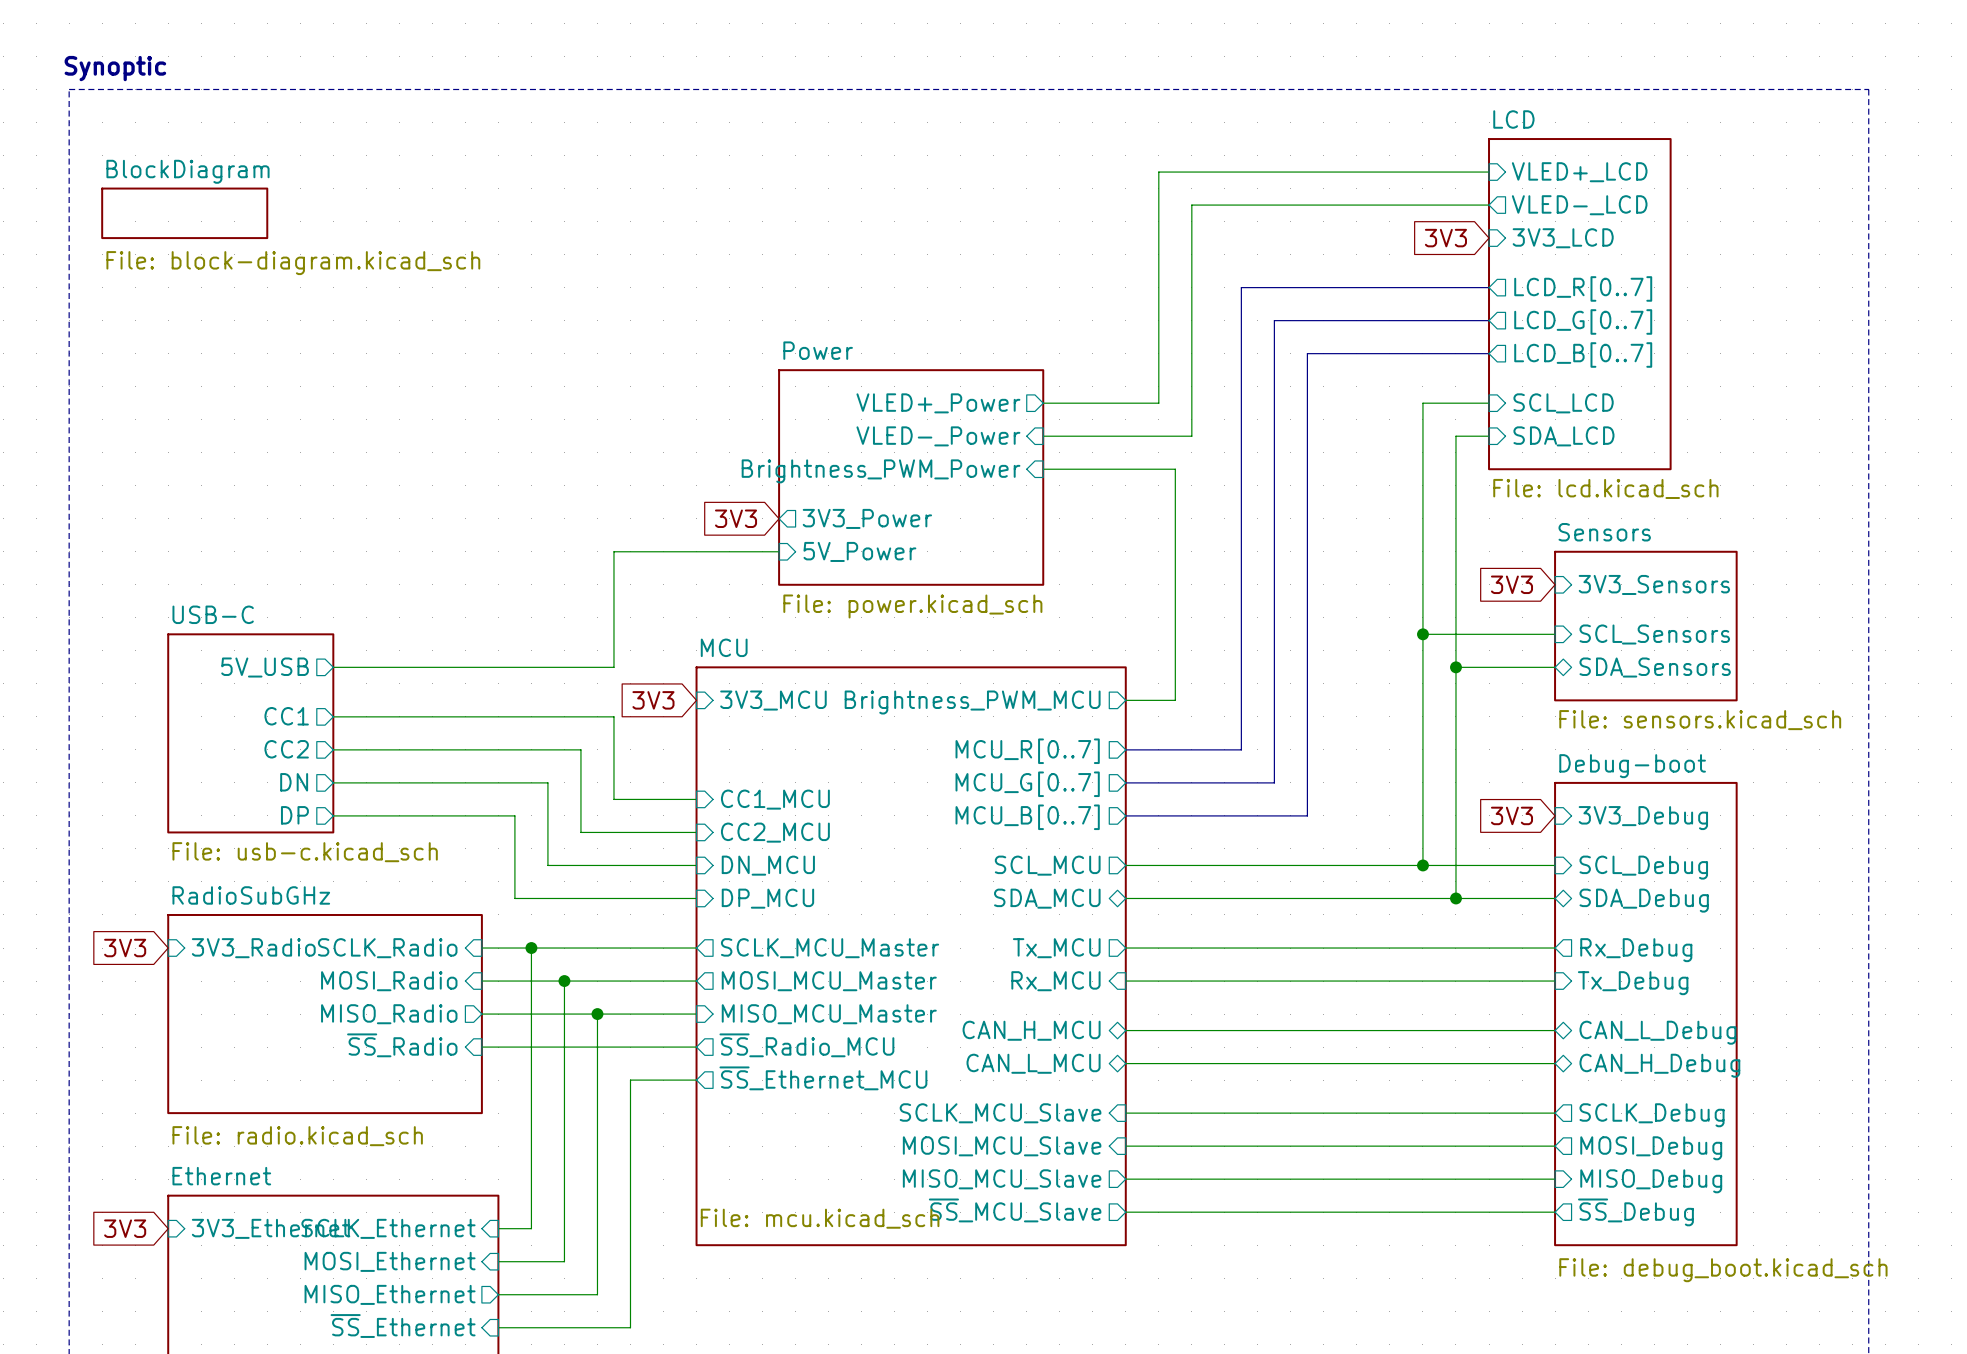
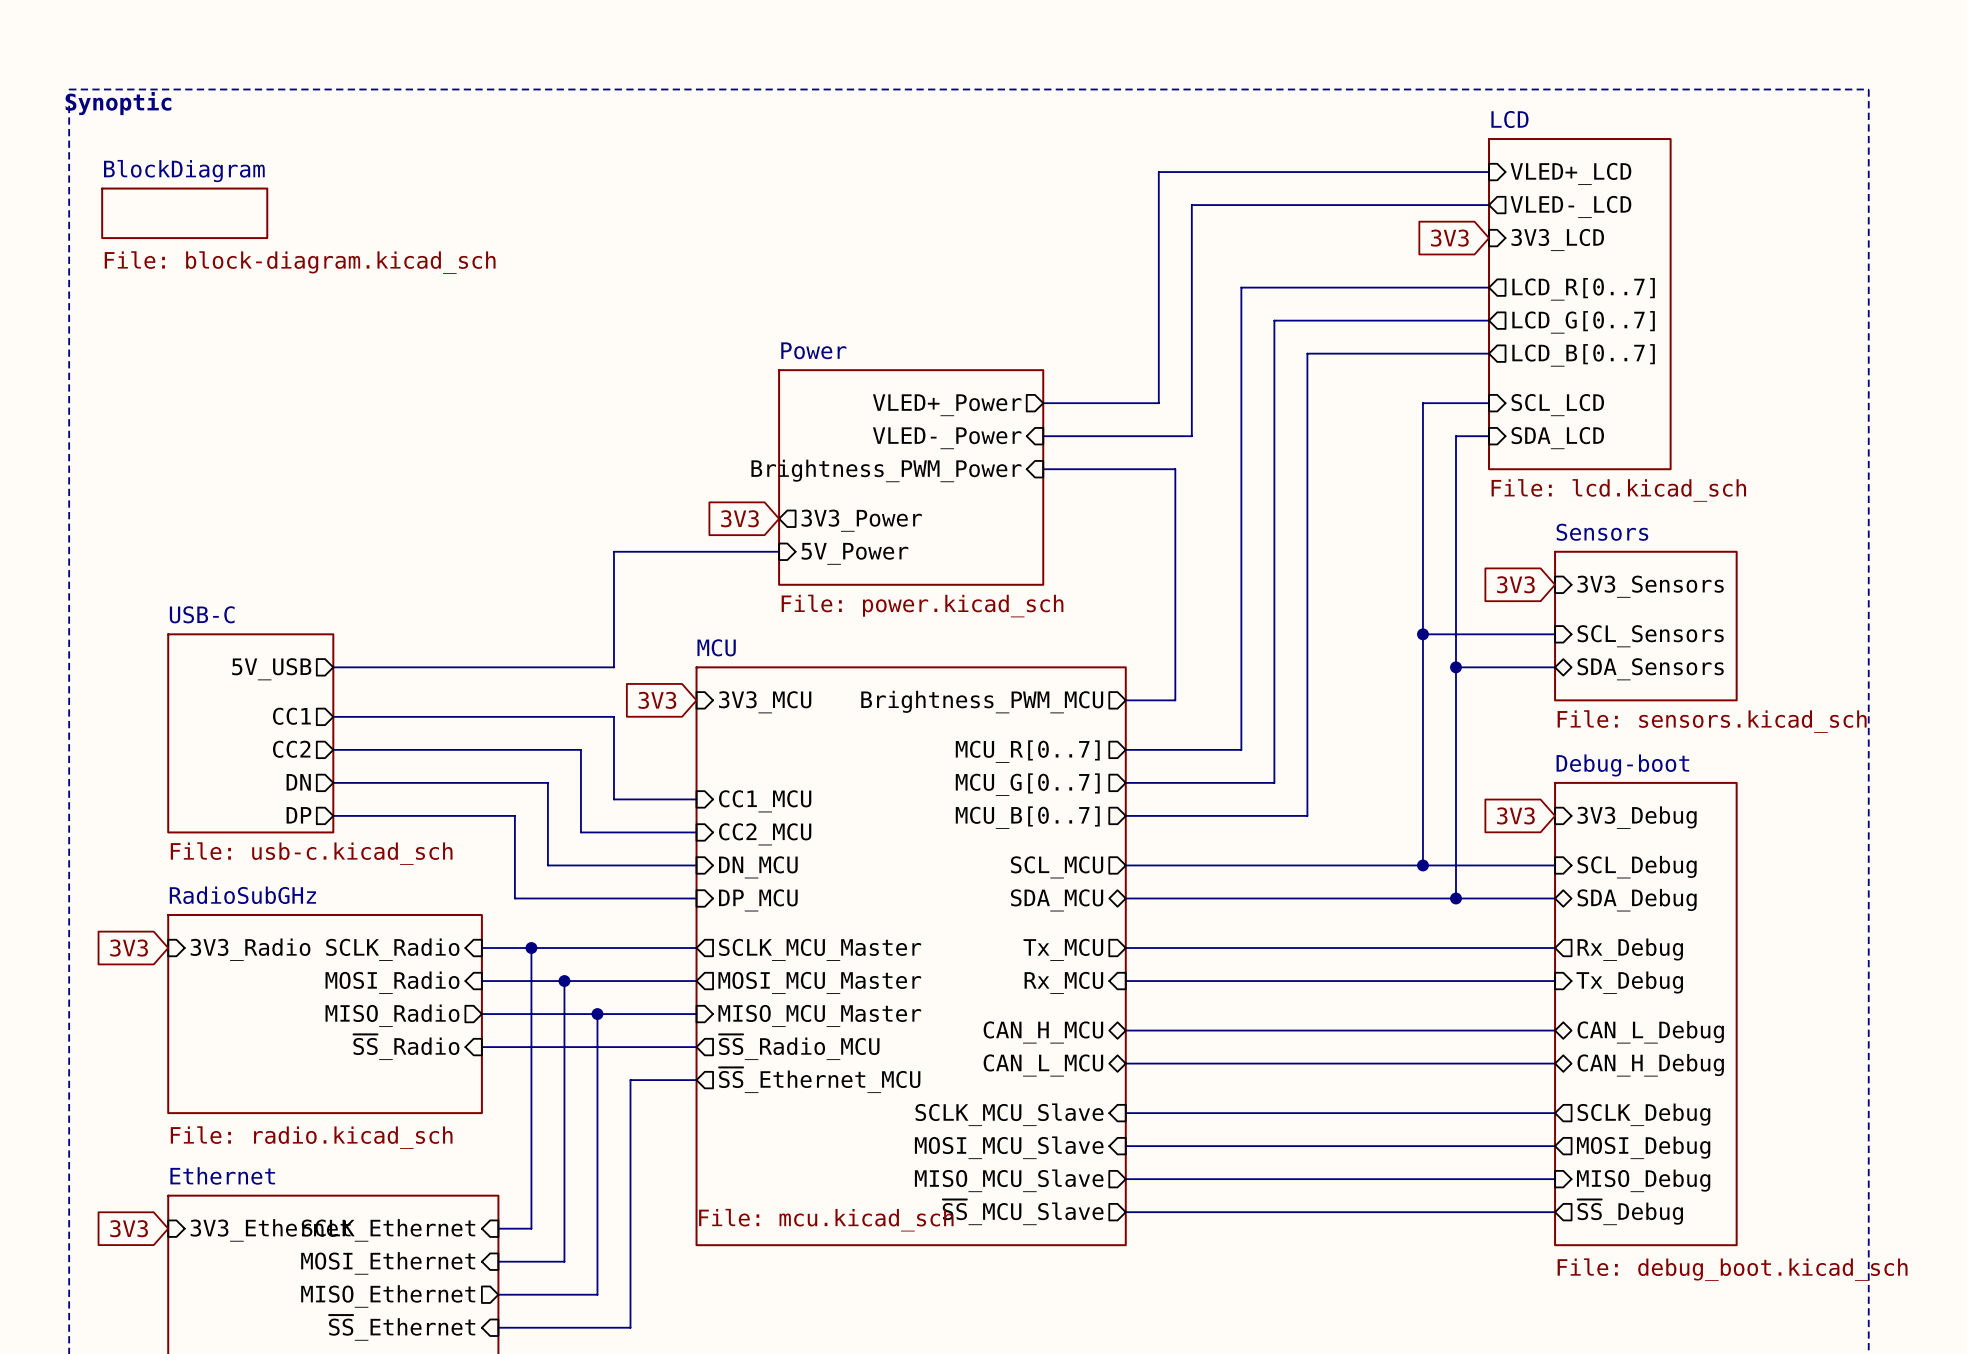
text position: Synoptic (115, 68) -> Synoptic (118, 103)

